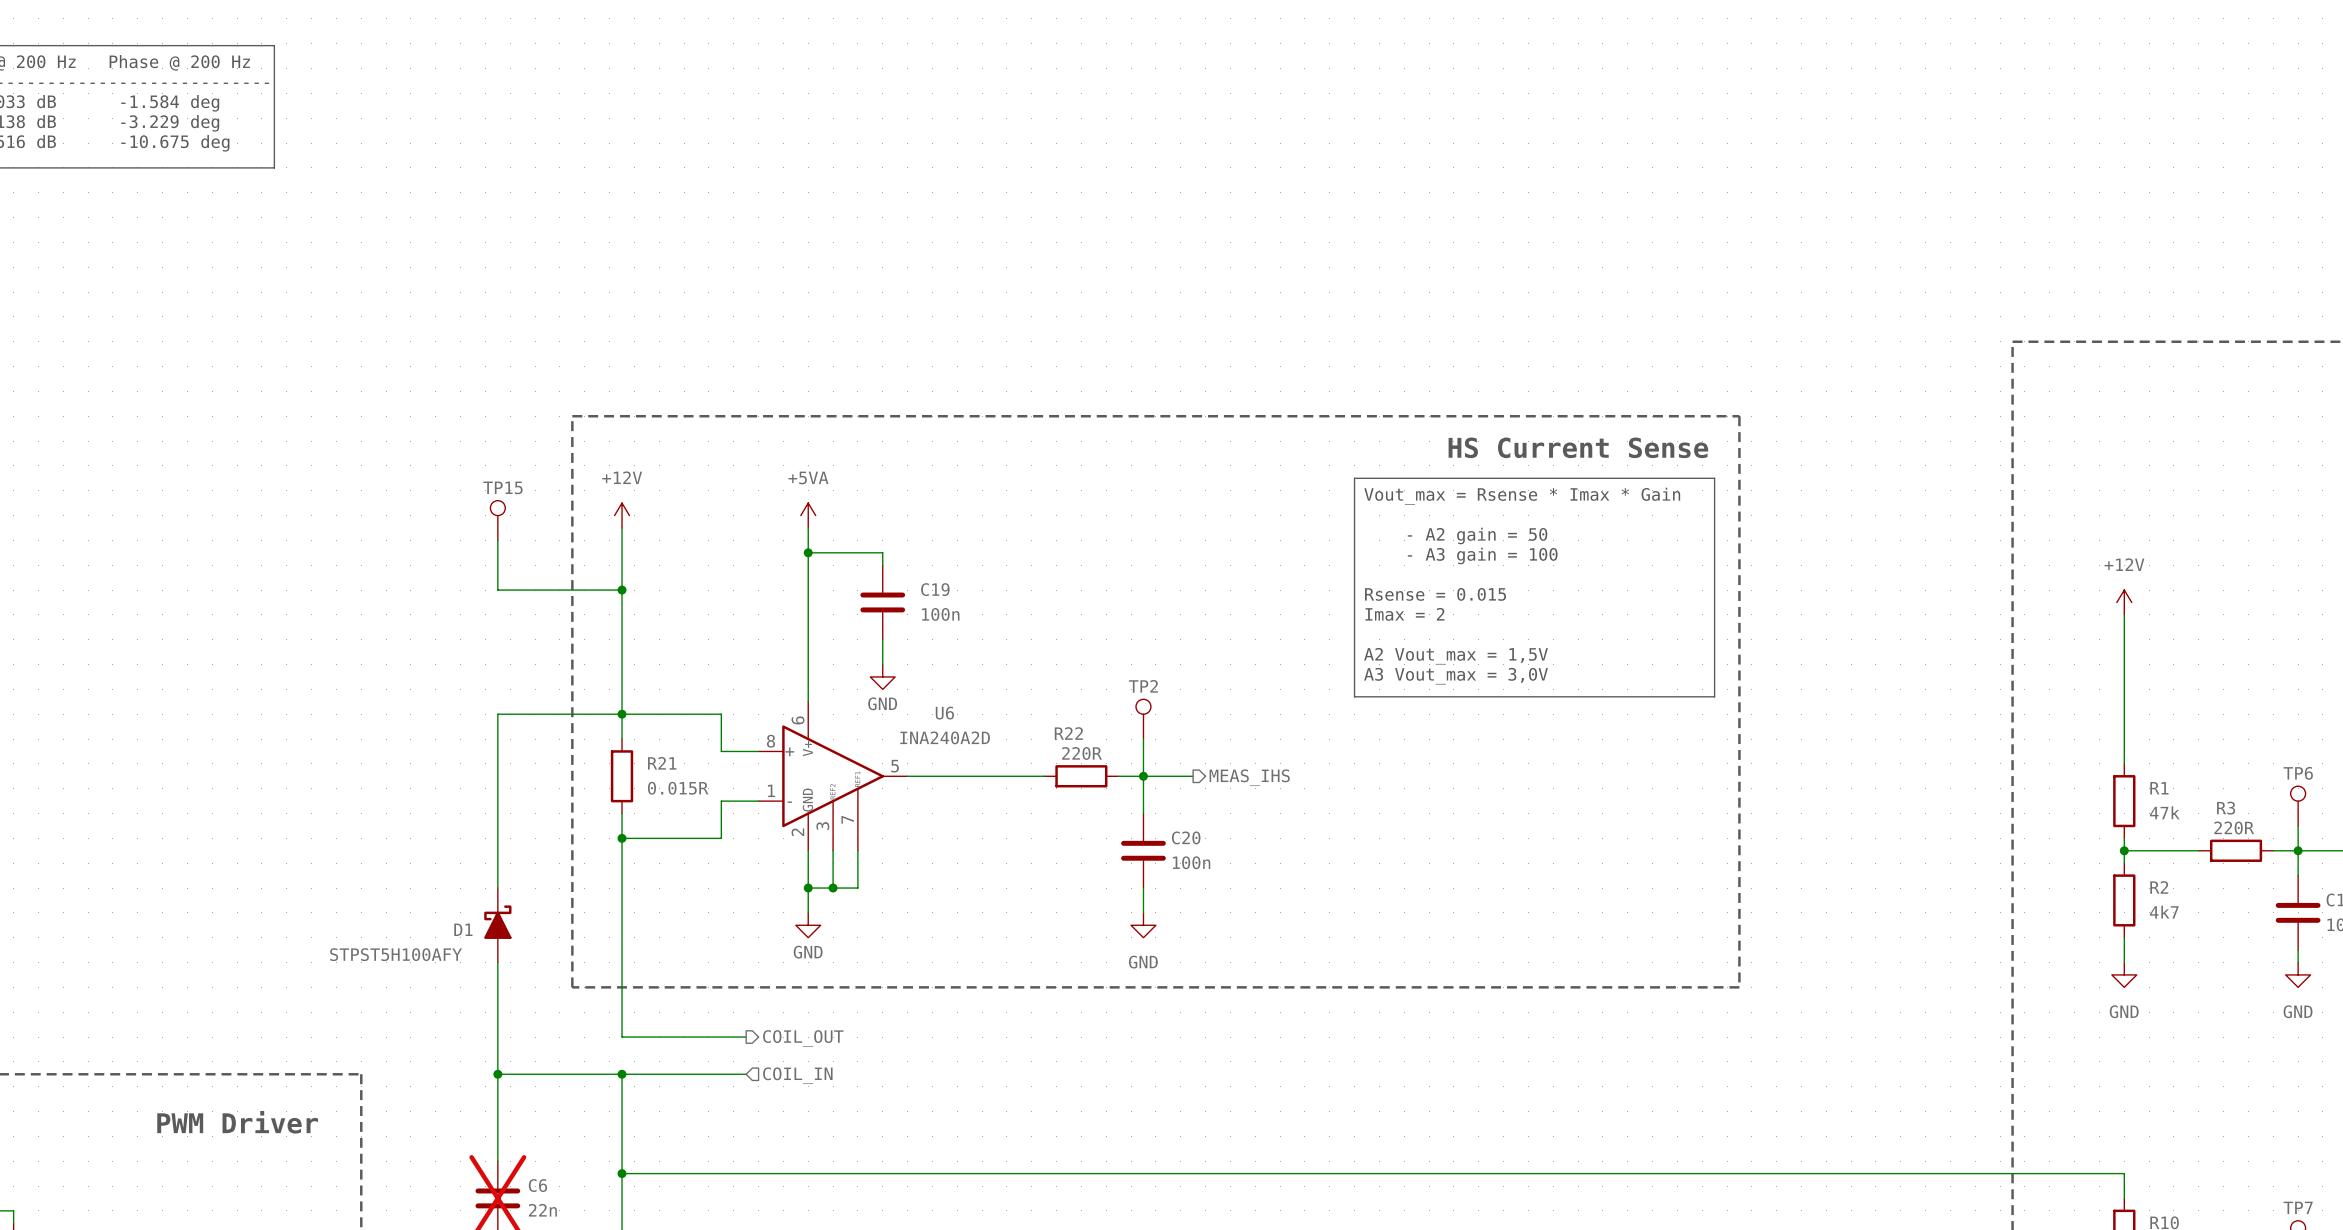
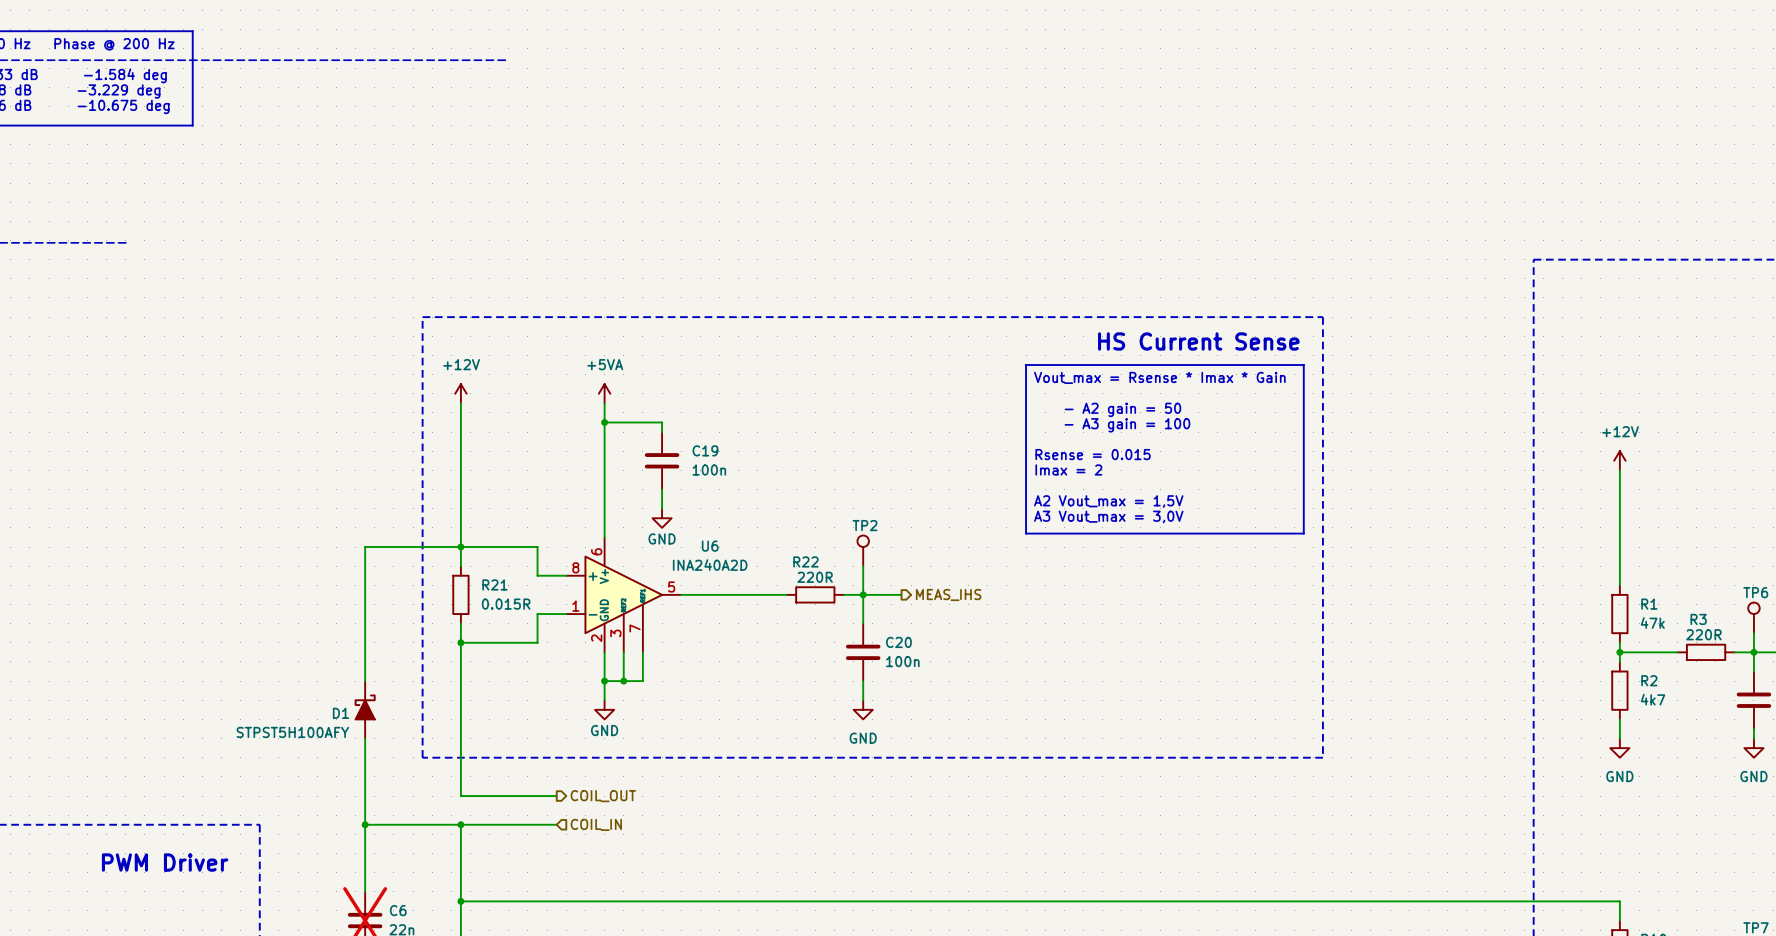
TP15: (497, 520) -> none
wire: (497, 540) (497, 590) (622, 590) -> none
junction: (622, 590) -> none

